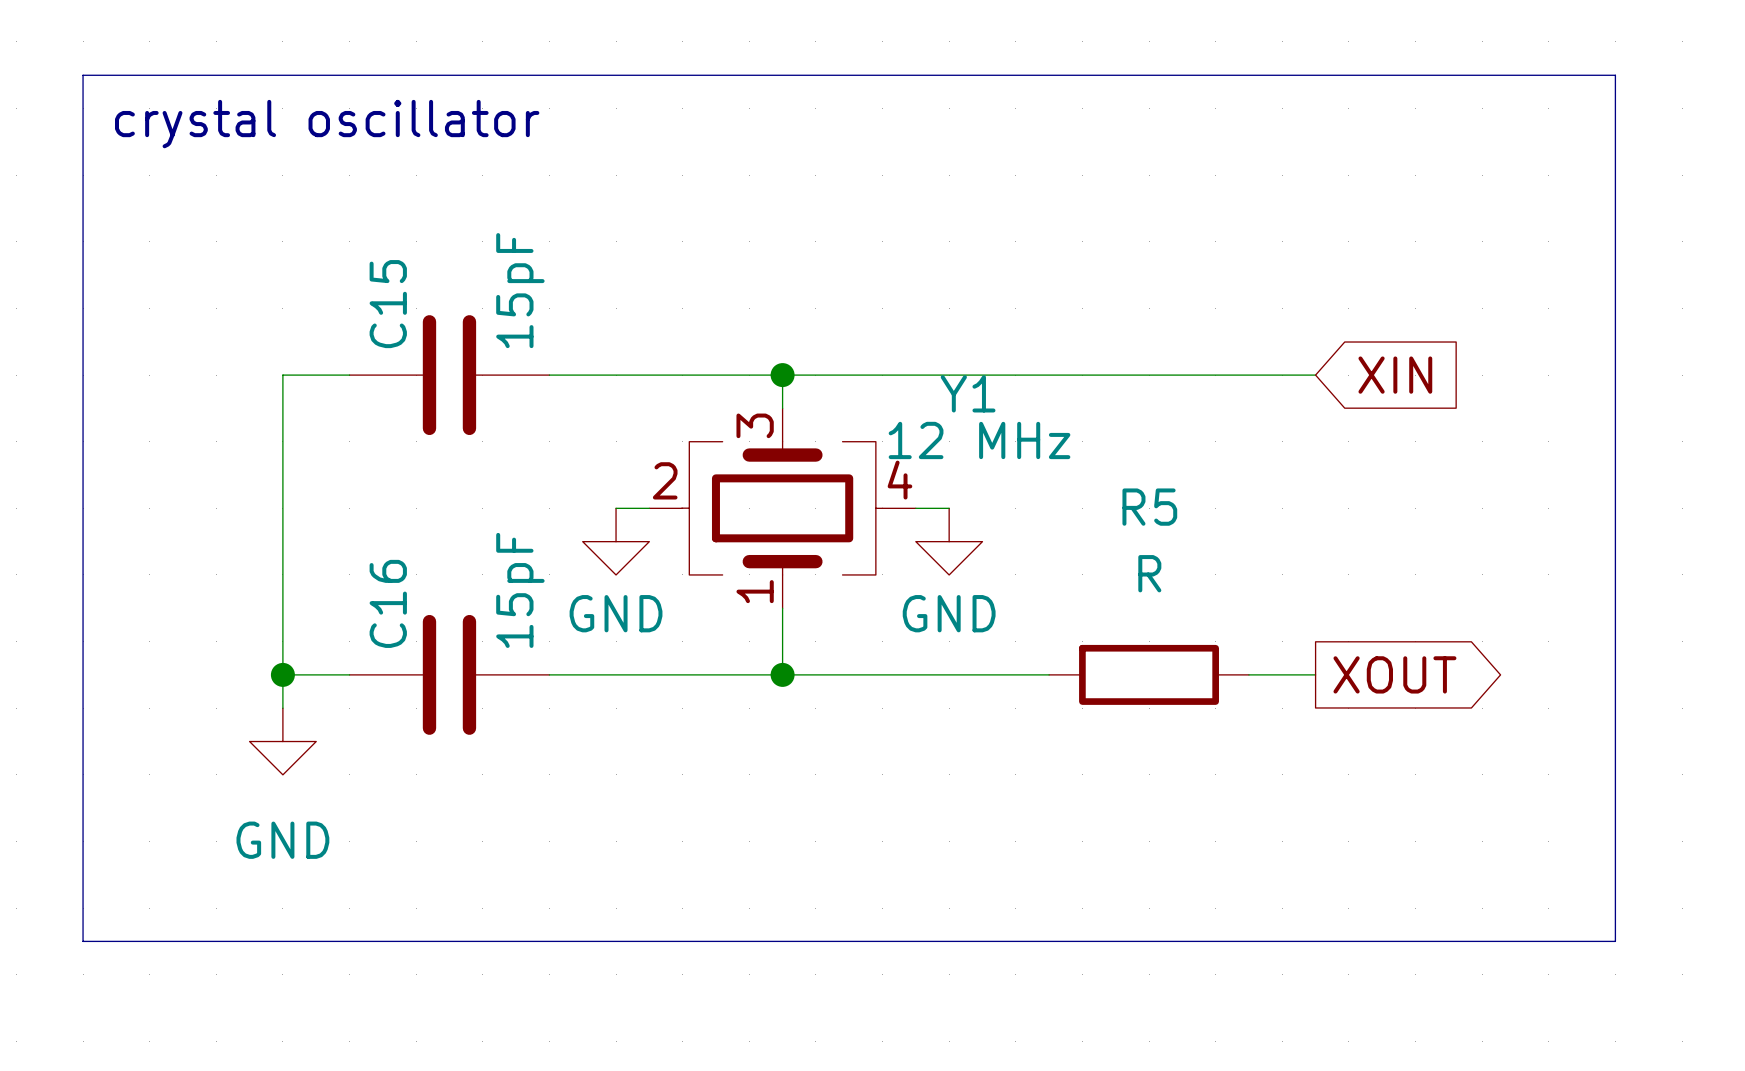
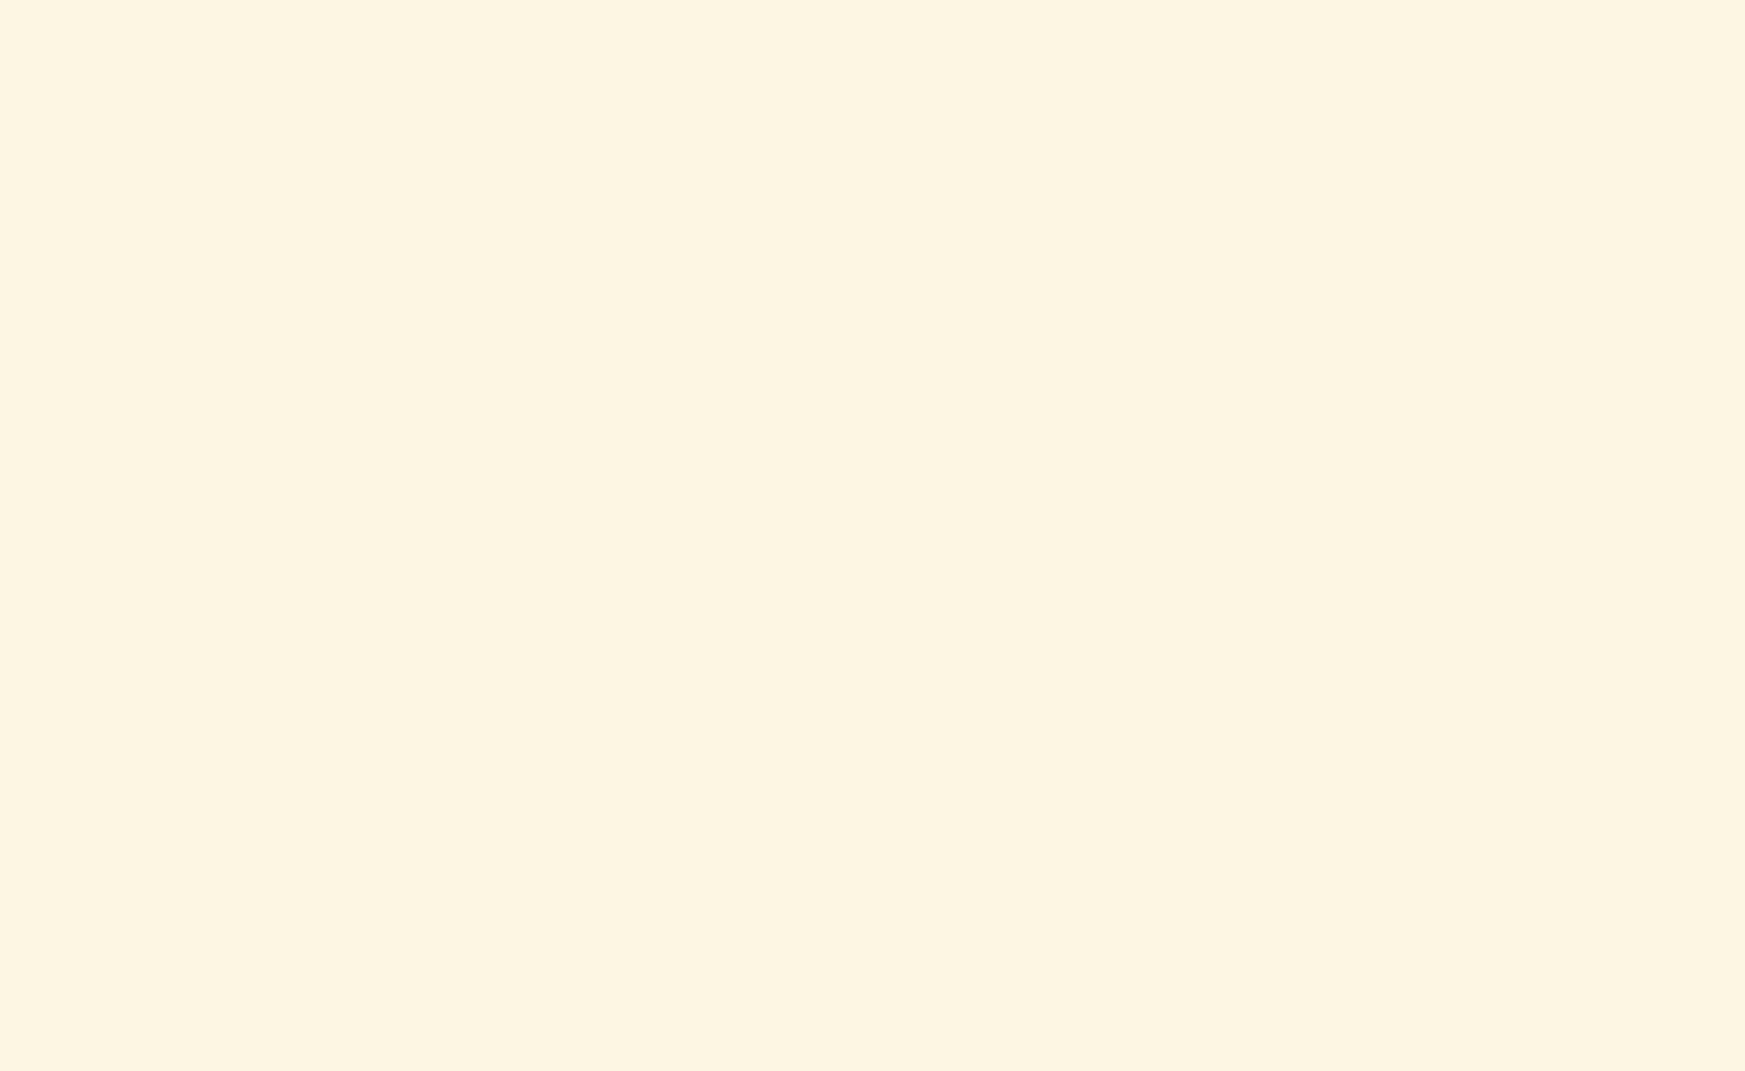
line: (83, 75) (1615, 75) (1615, 941) (83, 941) (83, 75) -> none
text: crystal oscillator (327, 124) -> none
wire: (349, 375) (282, 375) (282, 708) -> none
C15: 15pF (449, 375) -> none
wire: (549, 375) (1315, 375) -> none
wire: (782, 375) (782, 408) -> none
junction: (782, 375) -> none
global label: XIN (1395, 375) -> none
wire: (616, 508) (649, 508) -> none
Y1: 12 MHz (782, 508) -> none
wire: (915, 508) (949, 508) -> none
power symbol: GND (616, 541) -> none
power symbol: GND (949, 541) -> none
wire: (782, 608) (782, 674) -> none
wire: (282, 674) (349, 674) -> none
junction: (282, 674) -> none
C16: 15pF (449, 674) -> none
wire: (549, 674) (1049, 674) -> none
junction: (782, 674) -> none
R5: R (1149, 674) -> none
wire: (1248, 674) (1315, 674) -> none
global label: XOUT (1394, 674) -> none
power symbol: GND (282, 741) -> none

